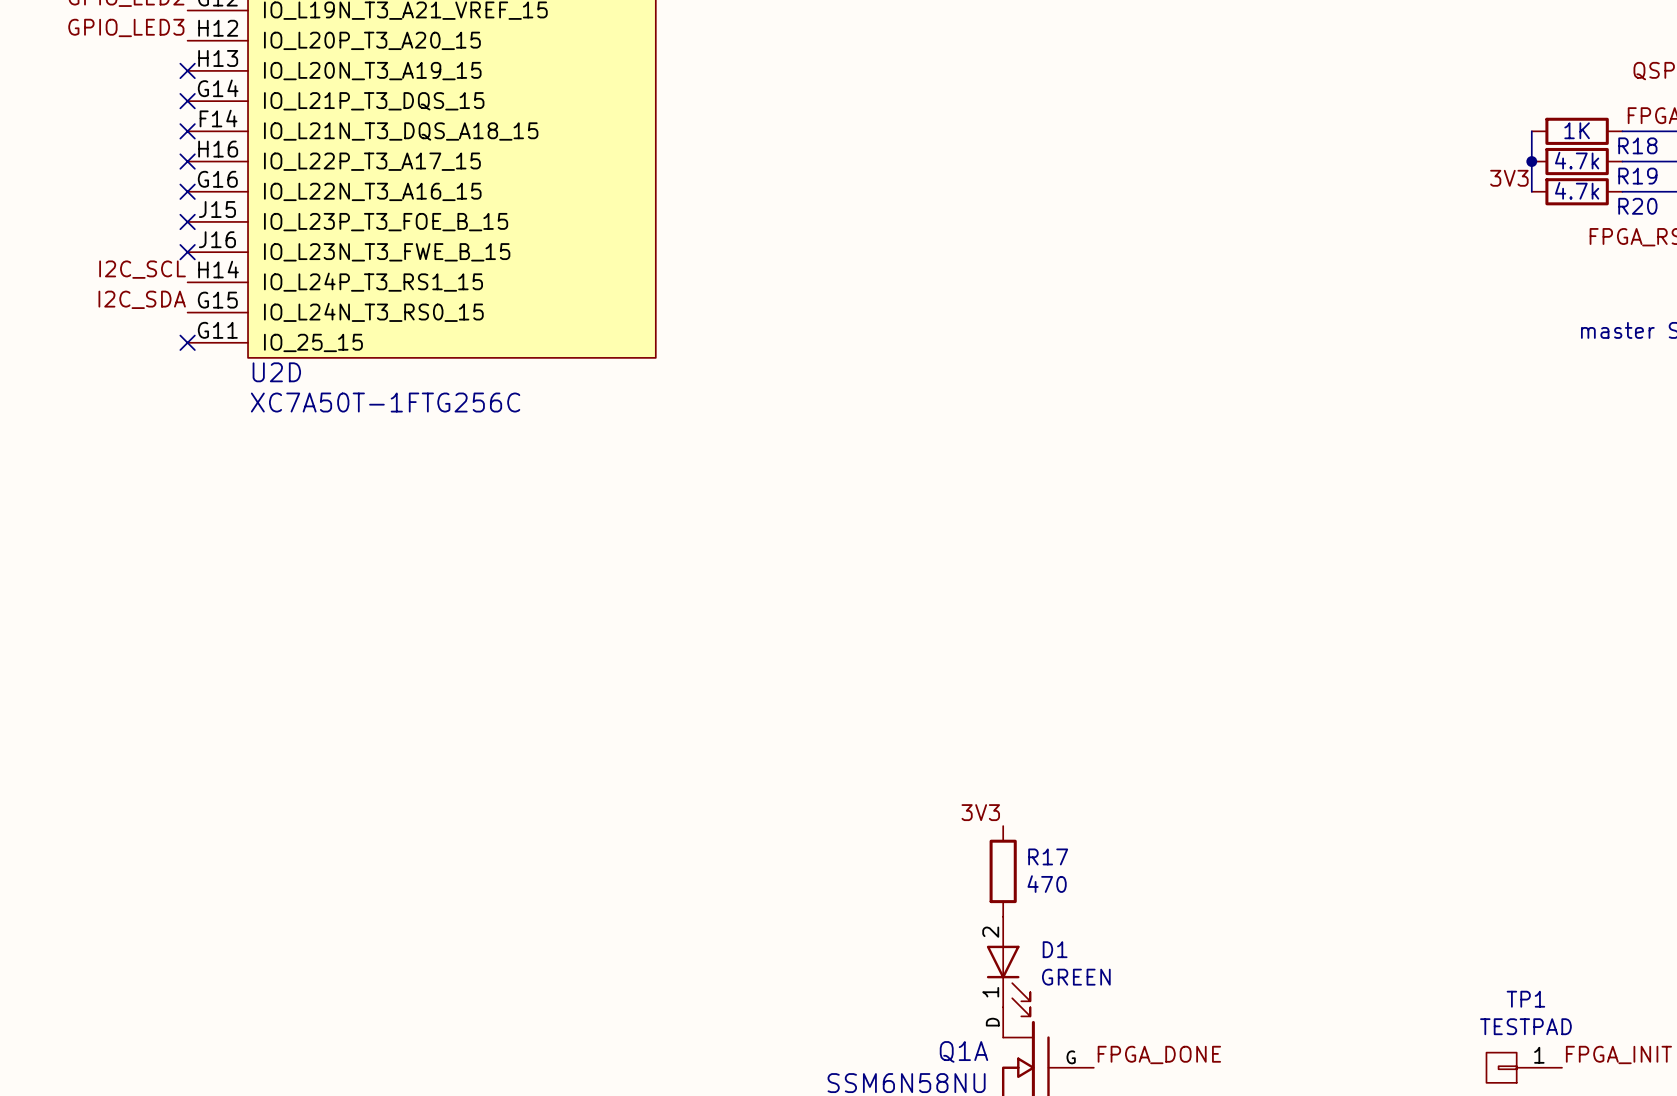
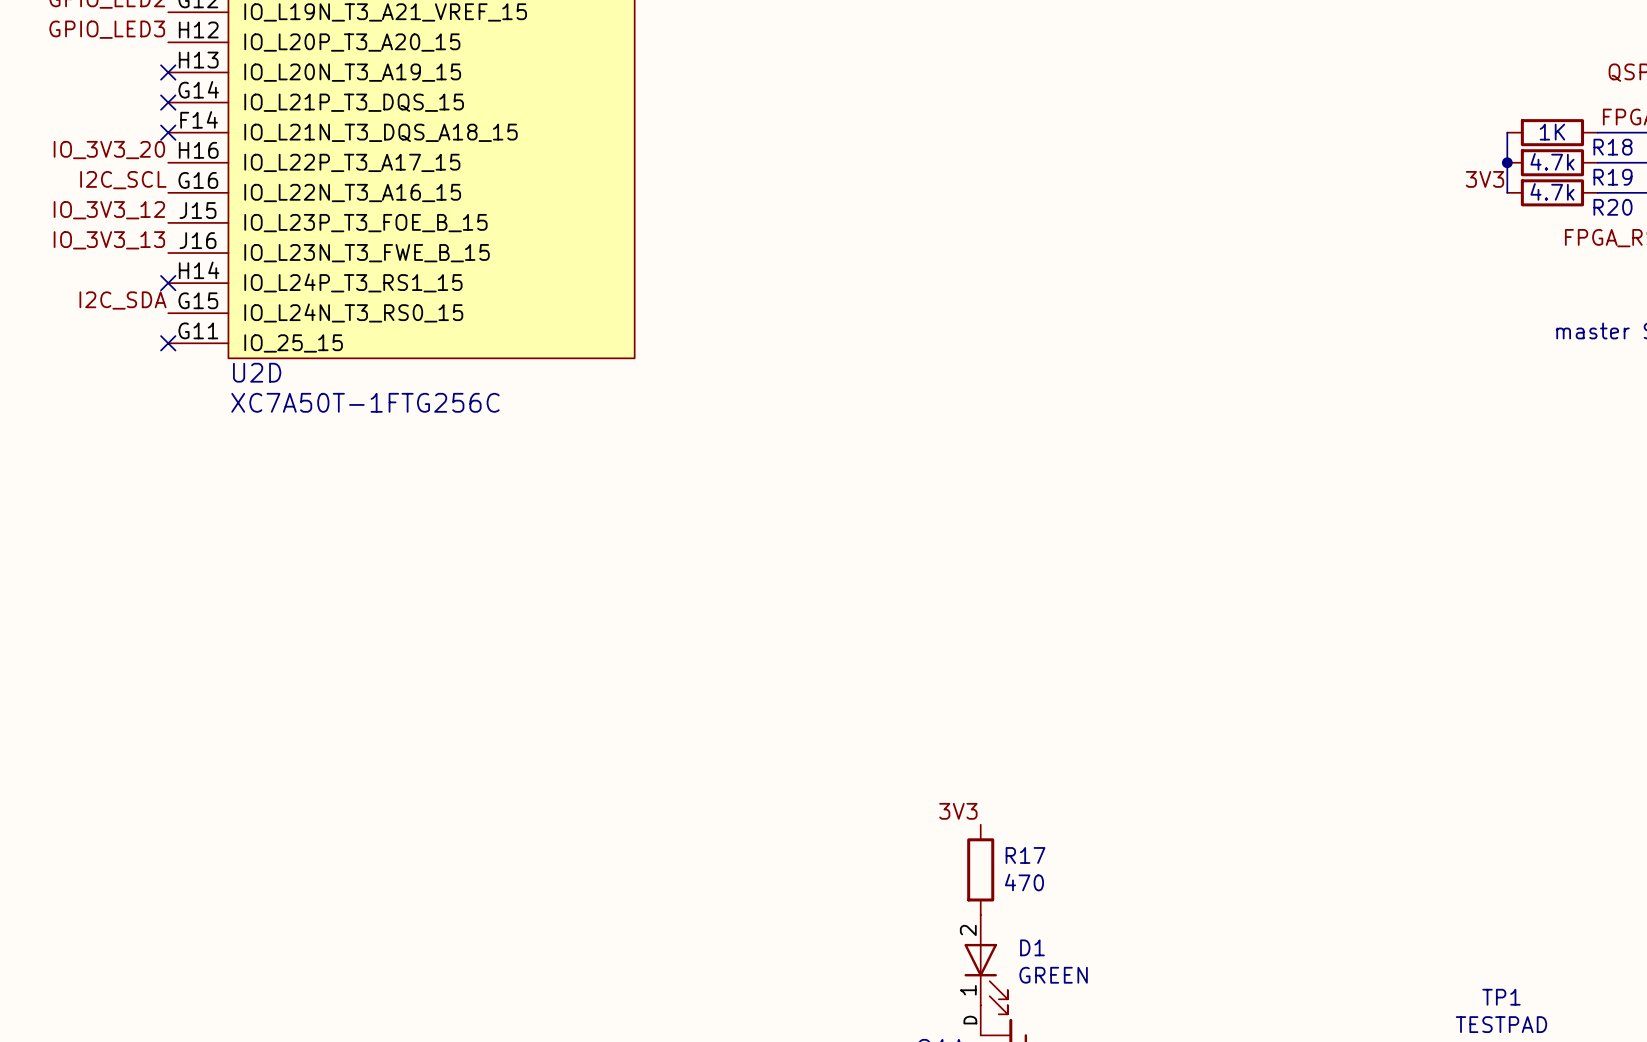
label: none -> IO_3V3_20 (109, 150)
no-connect mark: (187, 161) -> none
no-connect mark: (187, 191) -> none
label: none -> IO_3V3_12 (109, 210)
no-connect mark: (187, 221) -> none
label: none -> IO_3V3_13 (109, 240)
no-connect mark: (187, 252) -> none
label position: I2C_SCL (142, 269) -> I2C_SCL (123, 180)
no-connect mark: none -> (168, 283)

